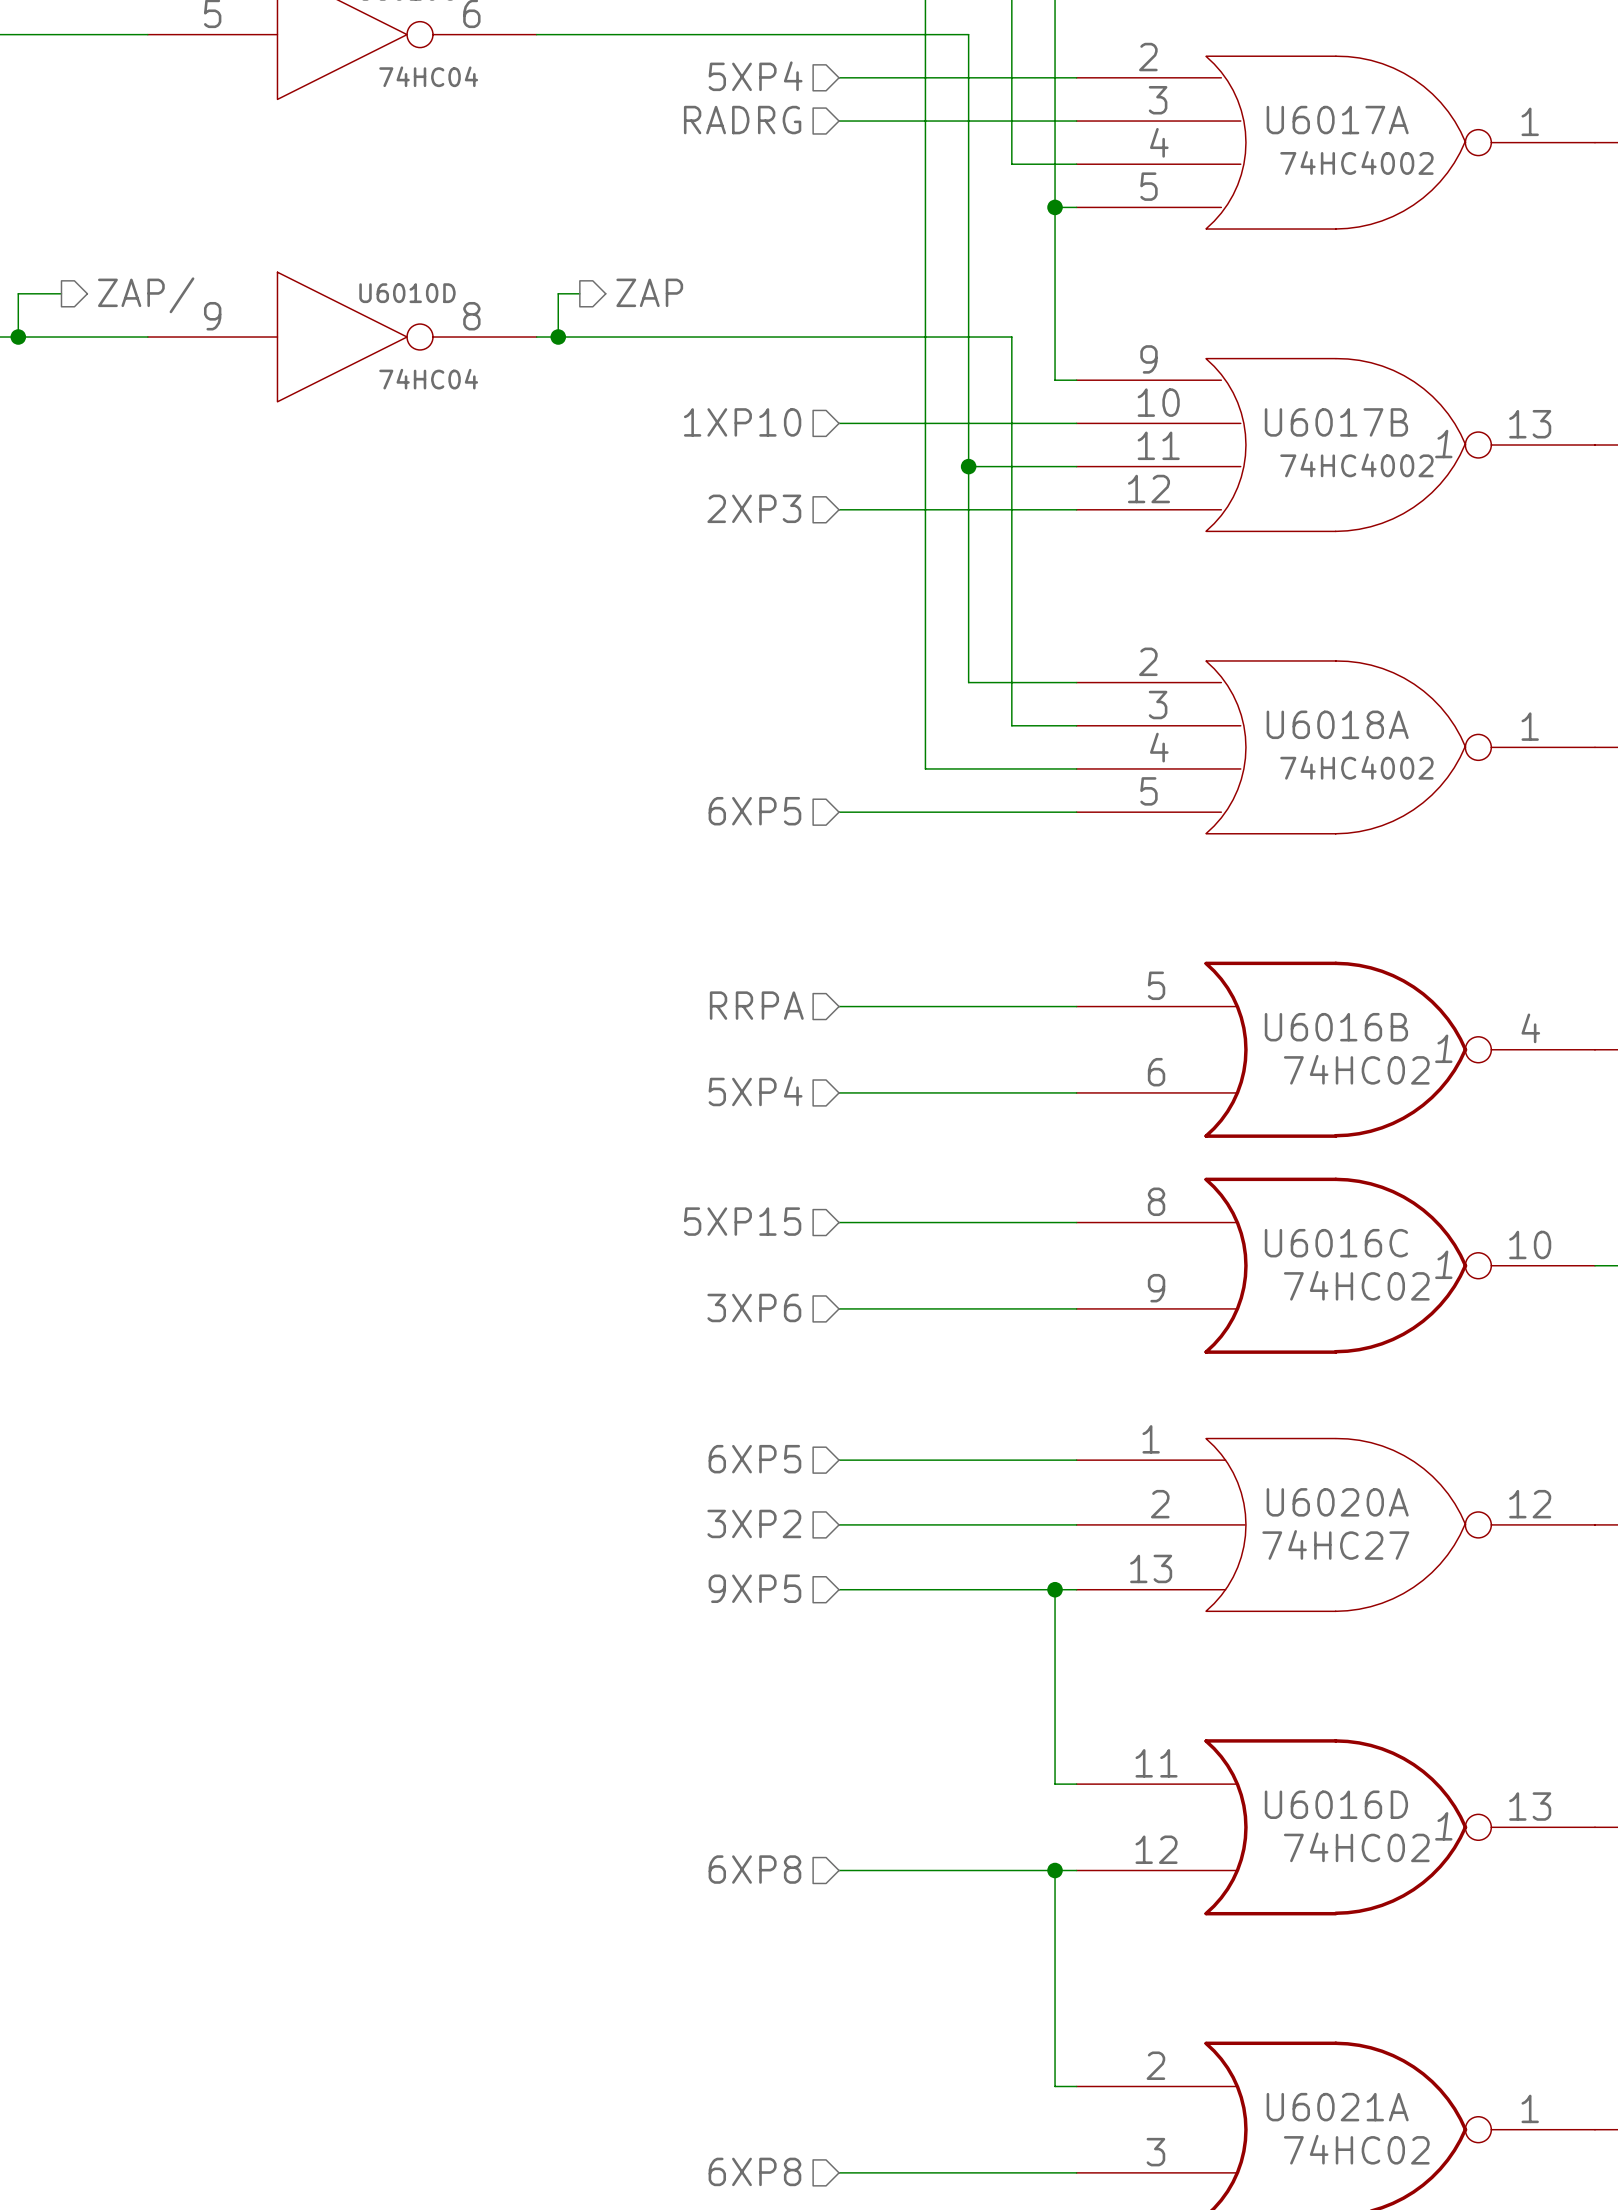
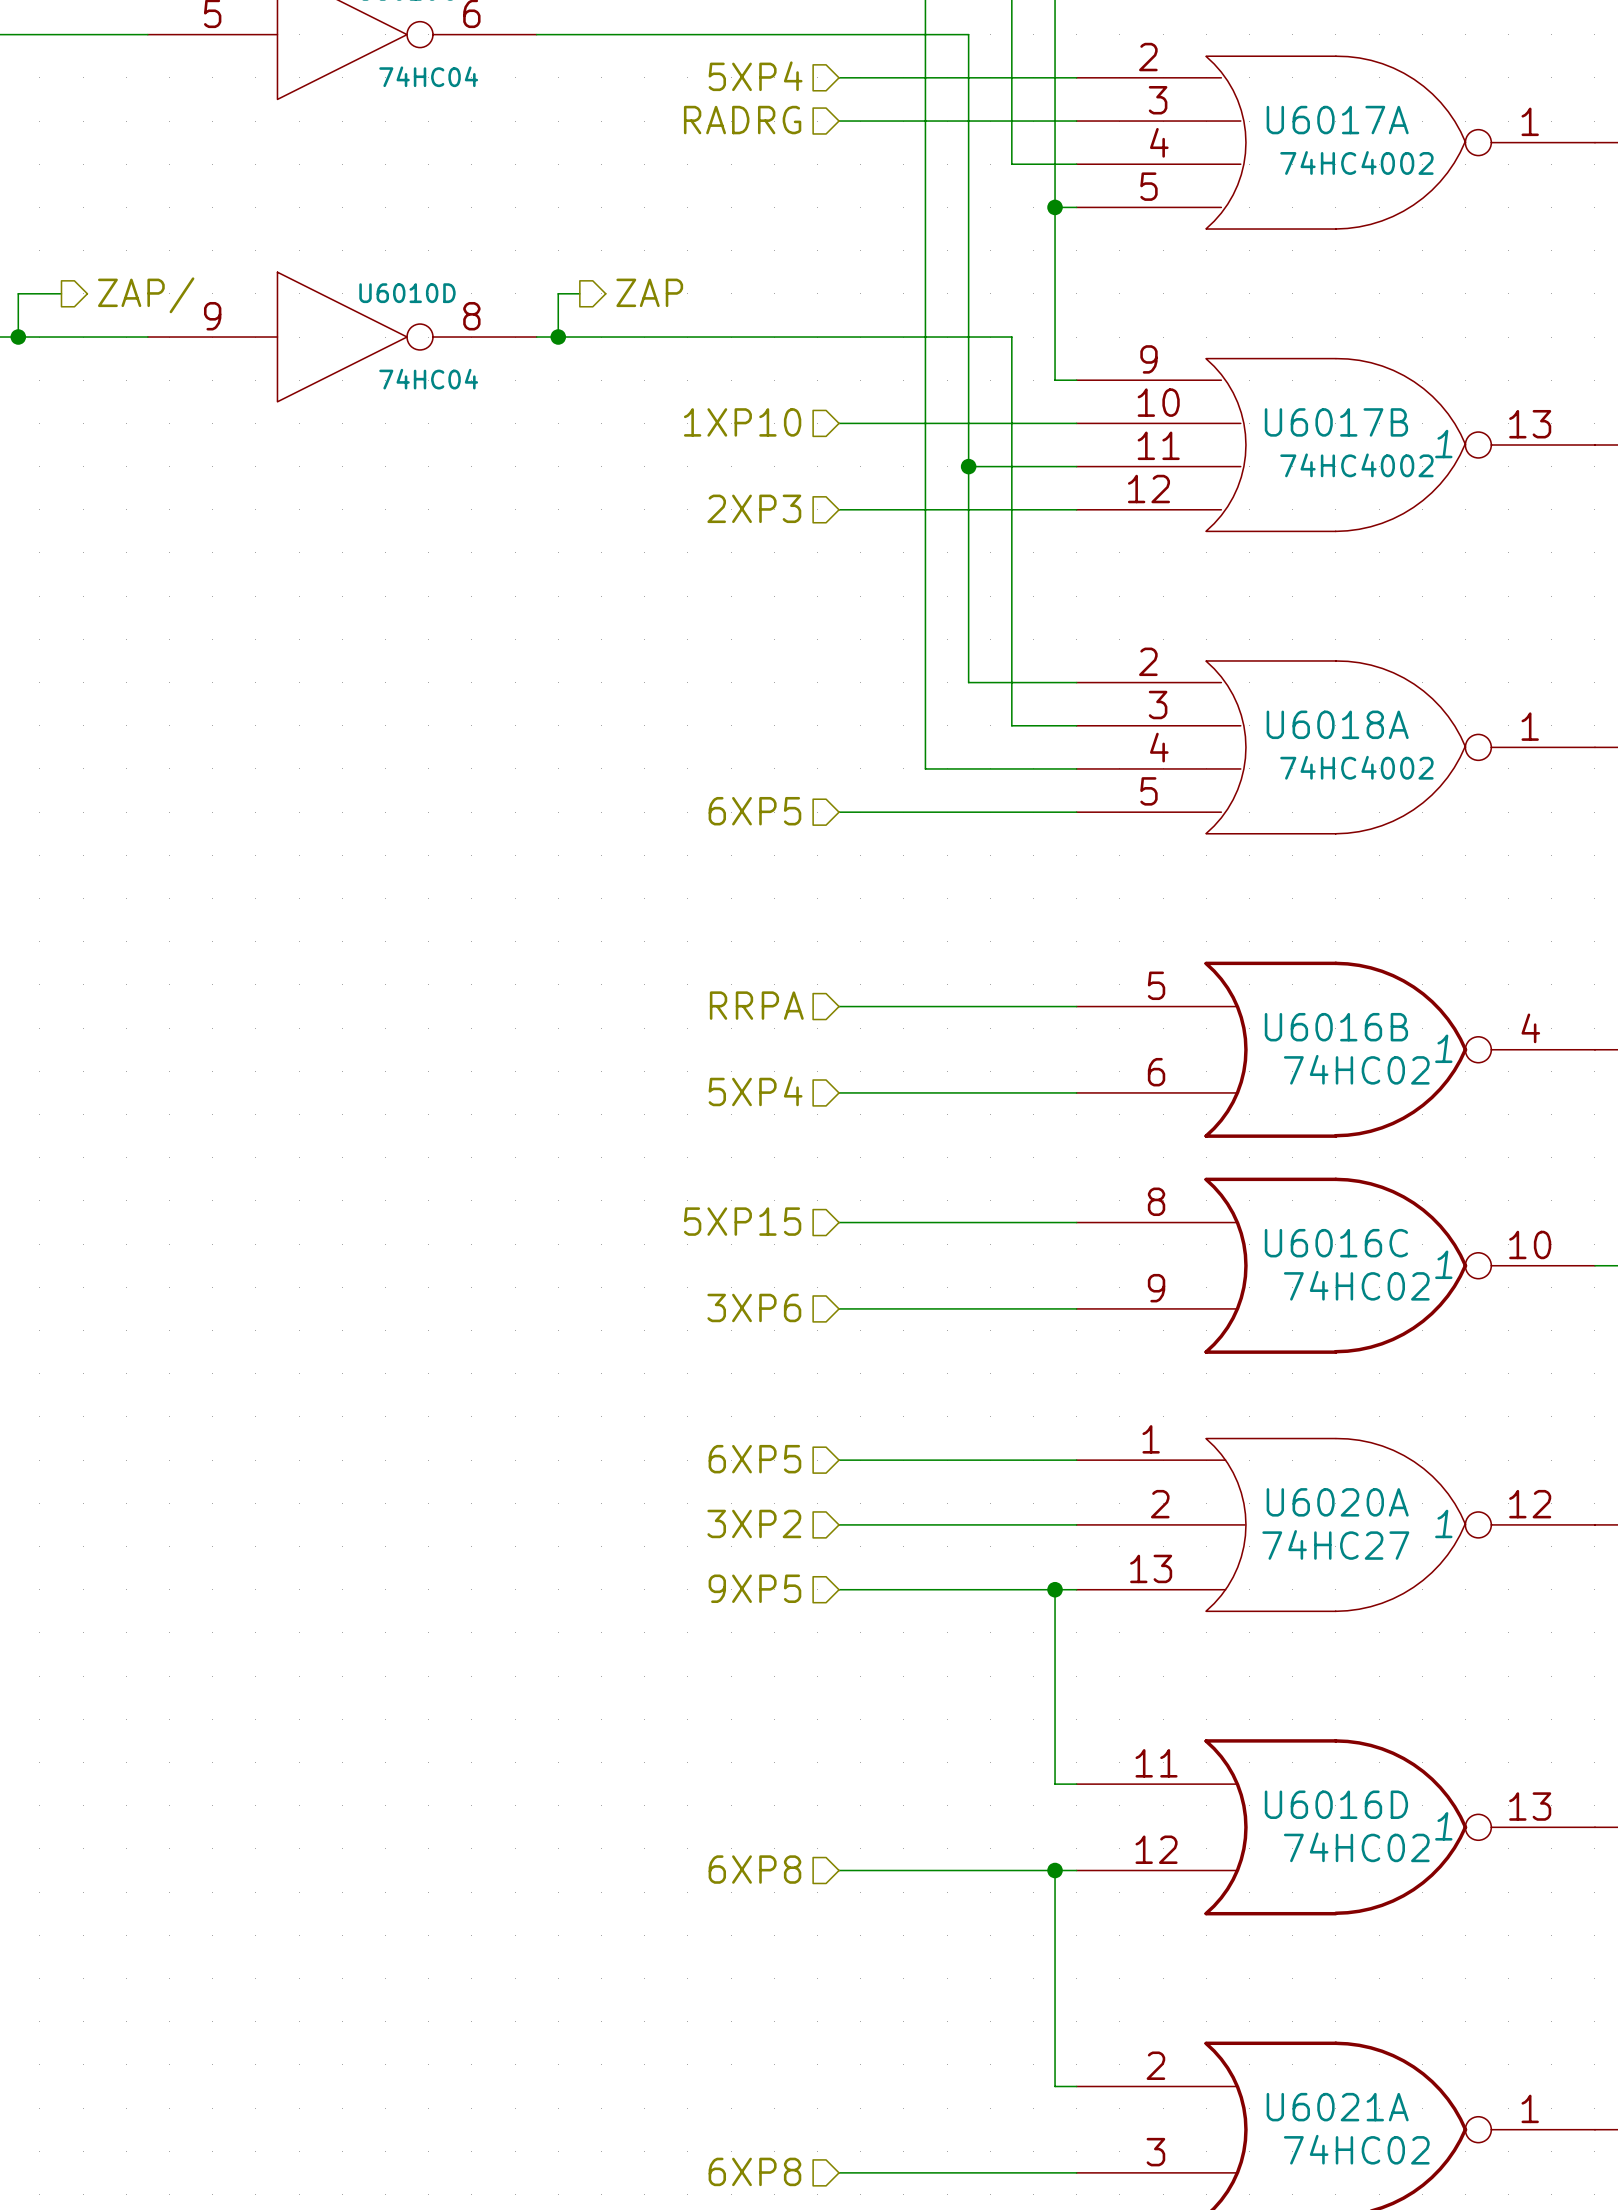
U6020A text: none -> 1 (1443, 1523)

